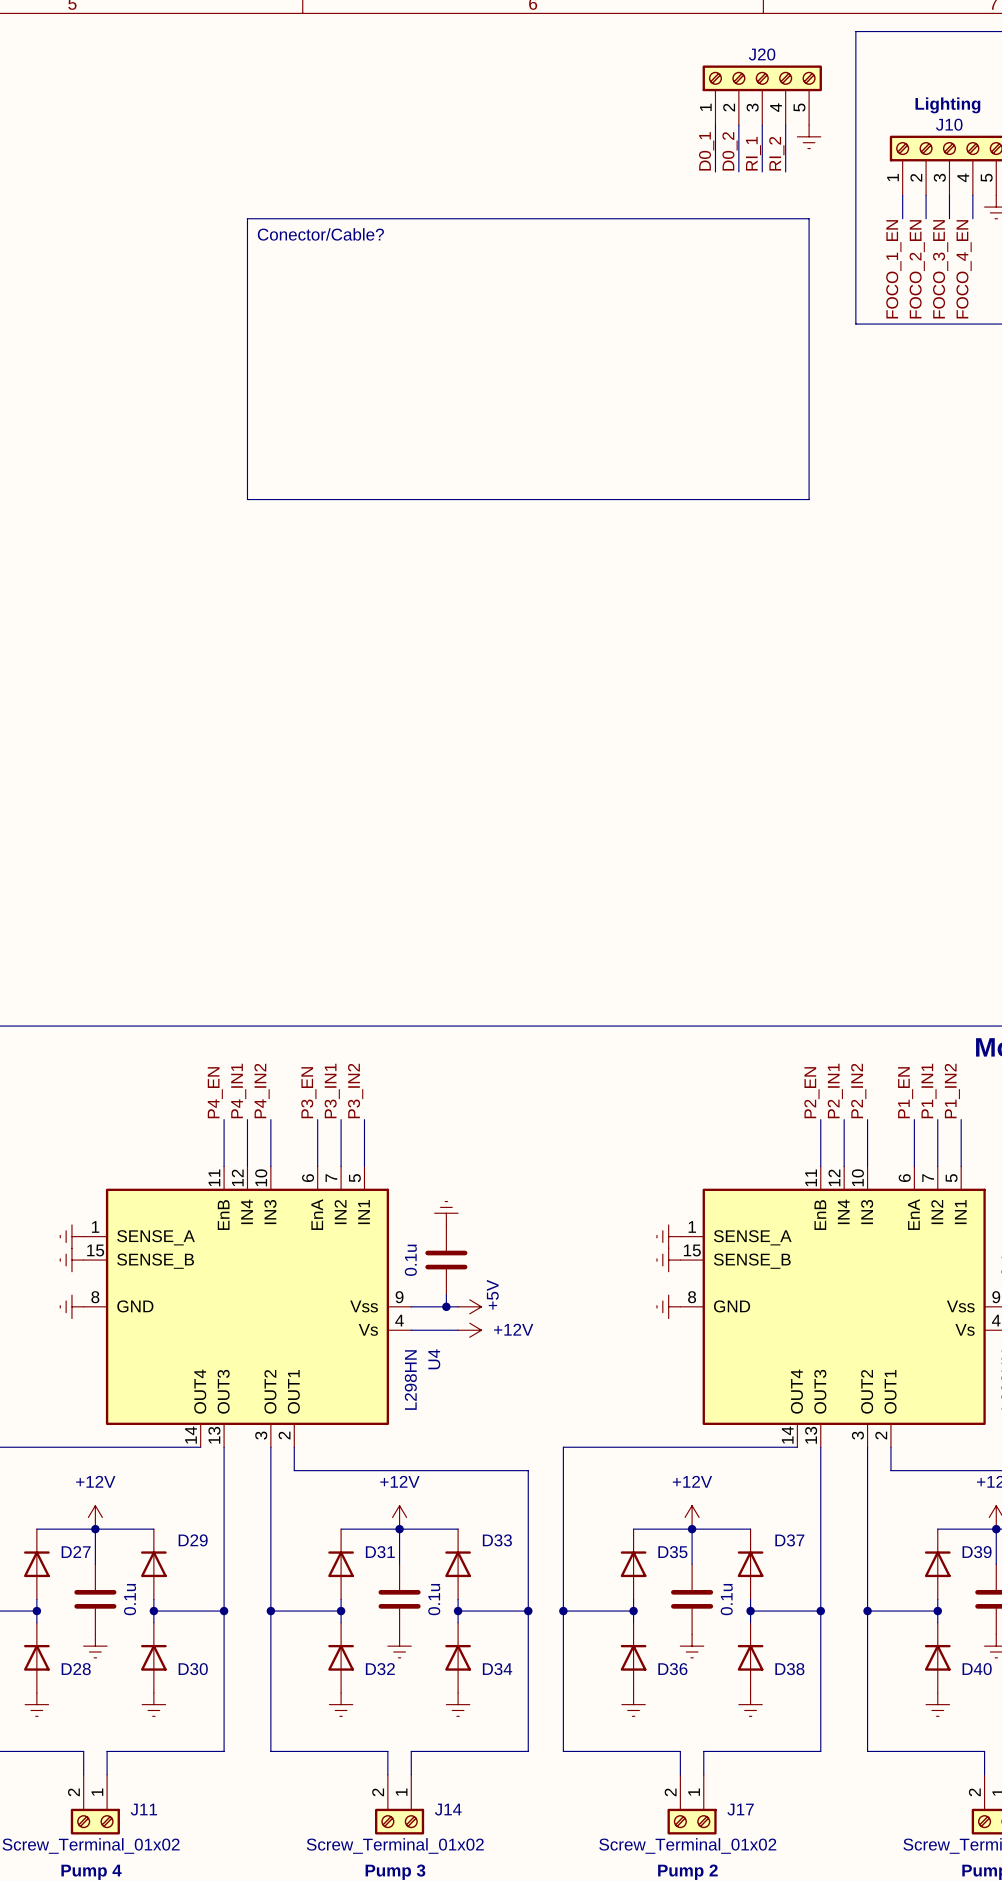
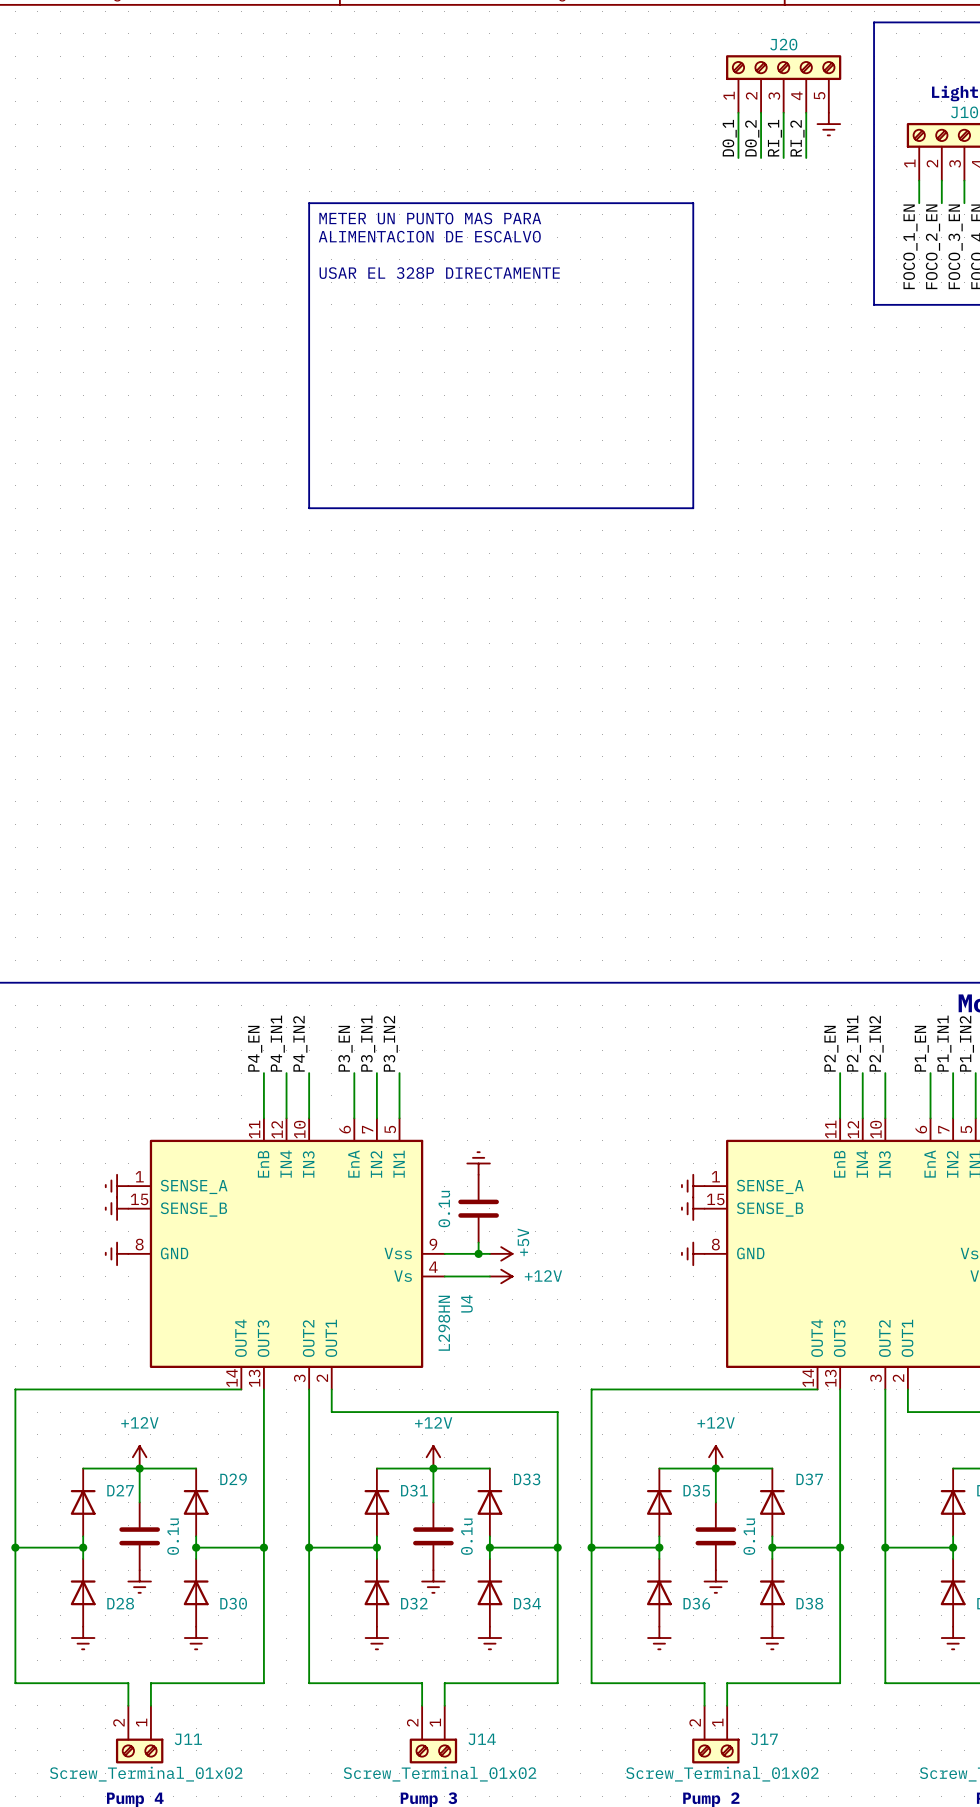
line: (270, 218) (247, 218) (247, 499) (809, 499) (809, 218) (668, 218) -> (309, 203) (309, 508) (693, 508) (693, 203)
text: Conector/Cable? (320, 234) -> none
text: none -> METER UN PUNTO MAS PARA (430, 218)
text: none -> ALIMENTACION DE ESCALVO (429, 236)
text: none -> USAR EL 328P DIRECTAMENTE (439, 273)

